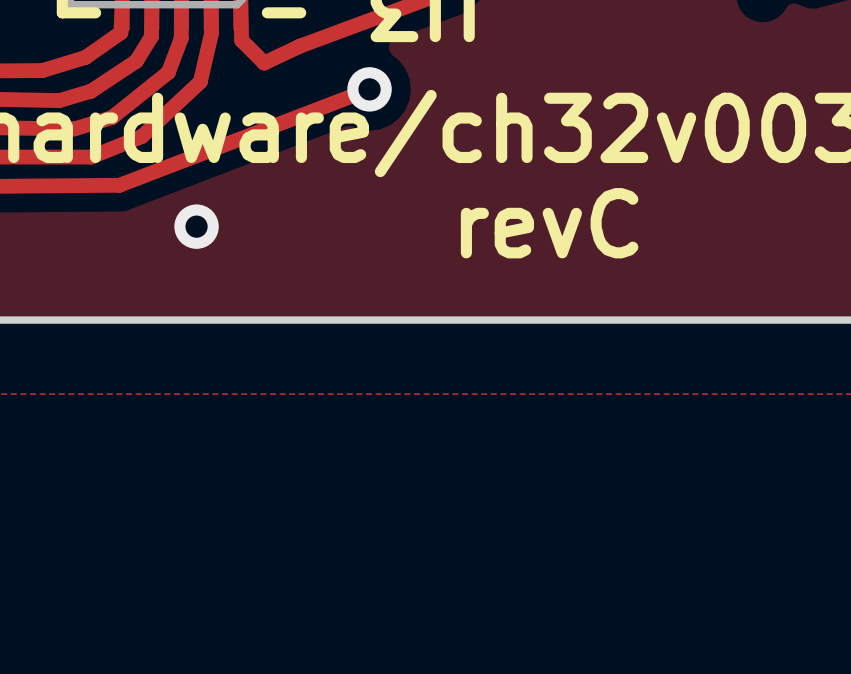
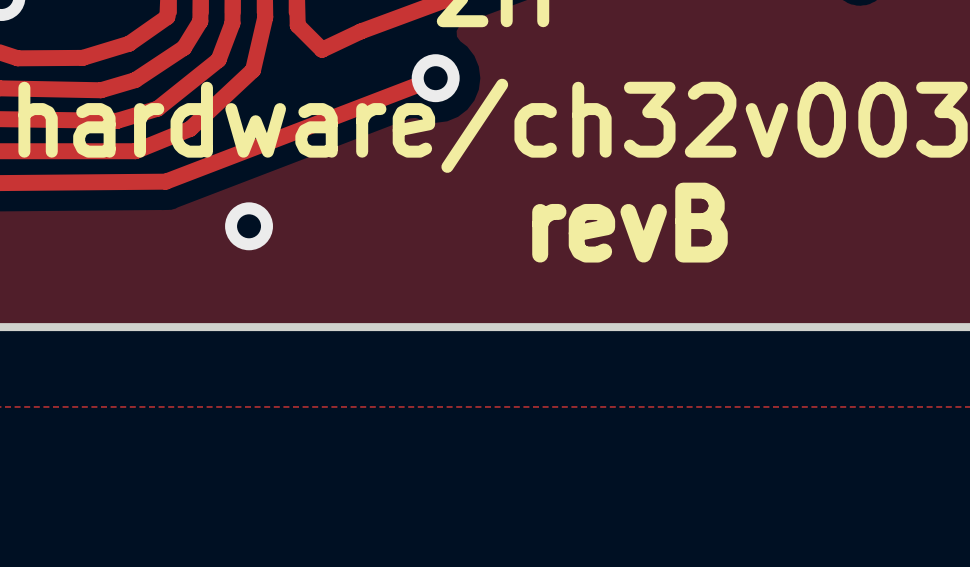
text: revC (549, 223) -> revB (629, 222)

